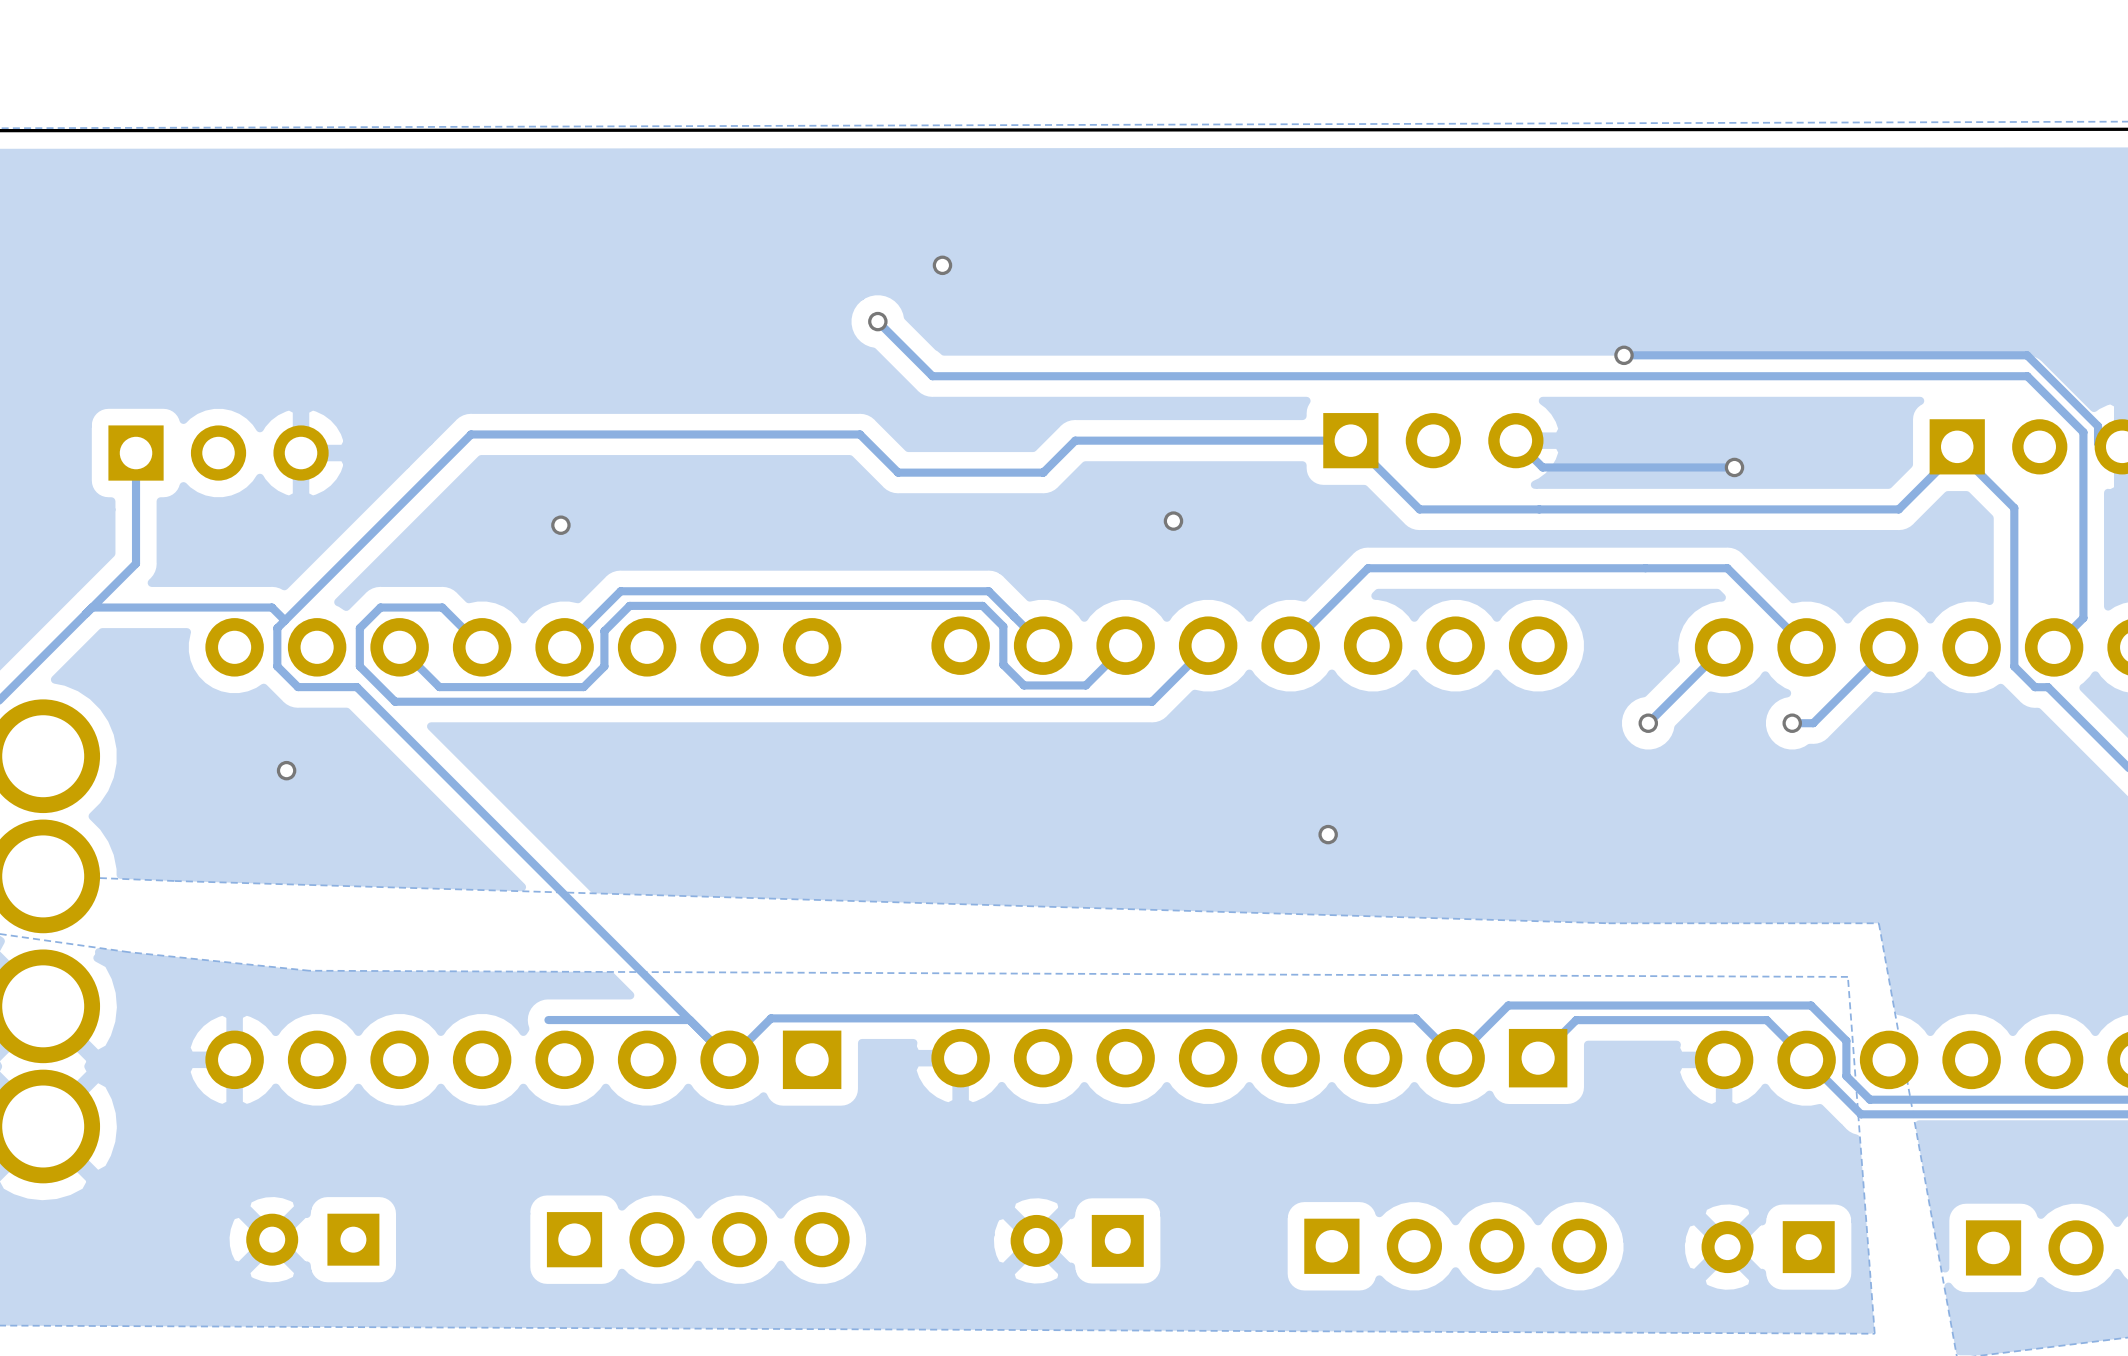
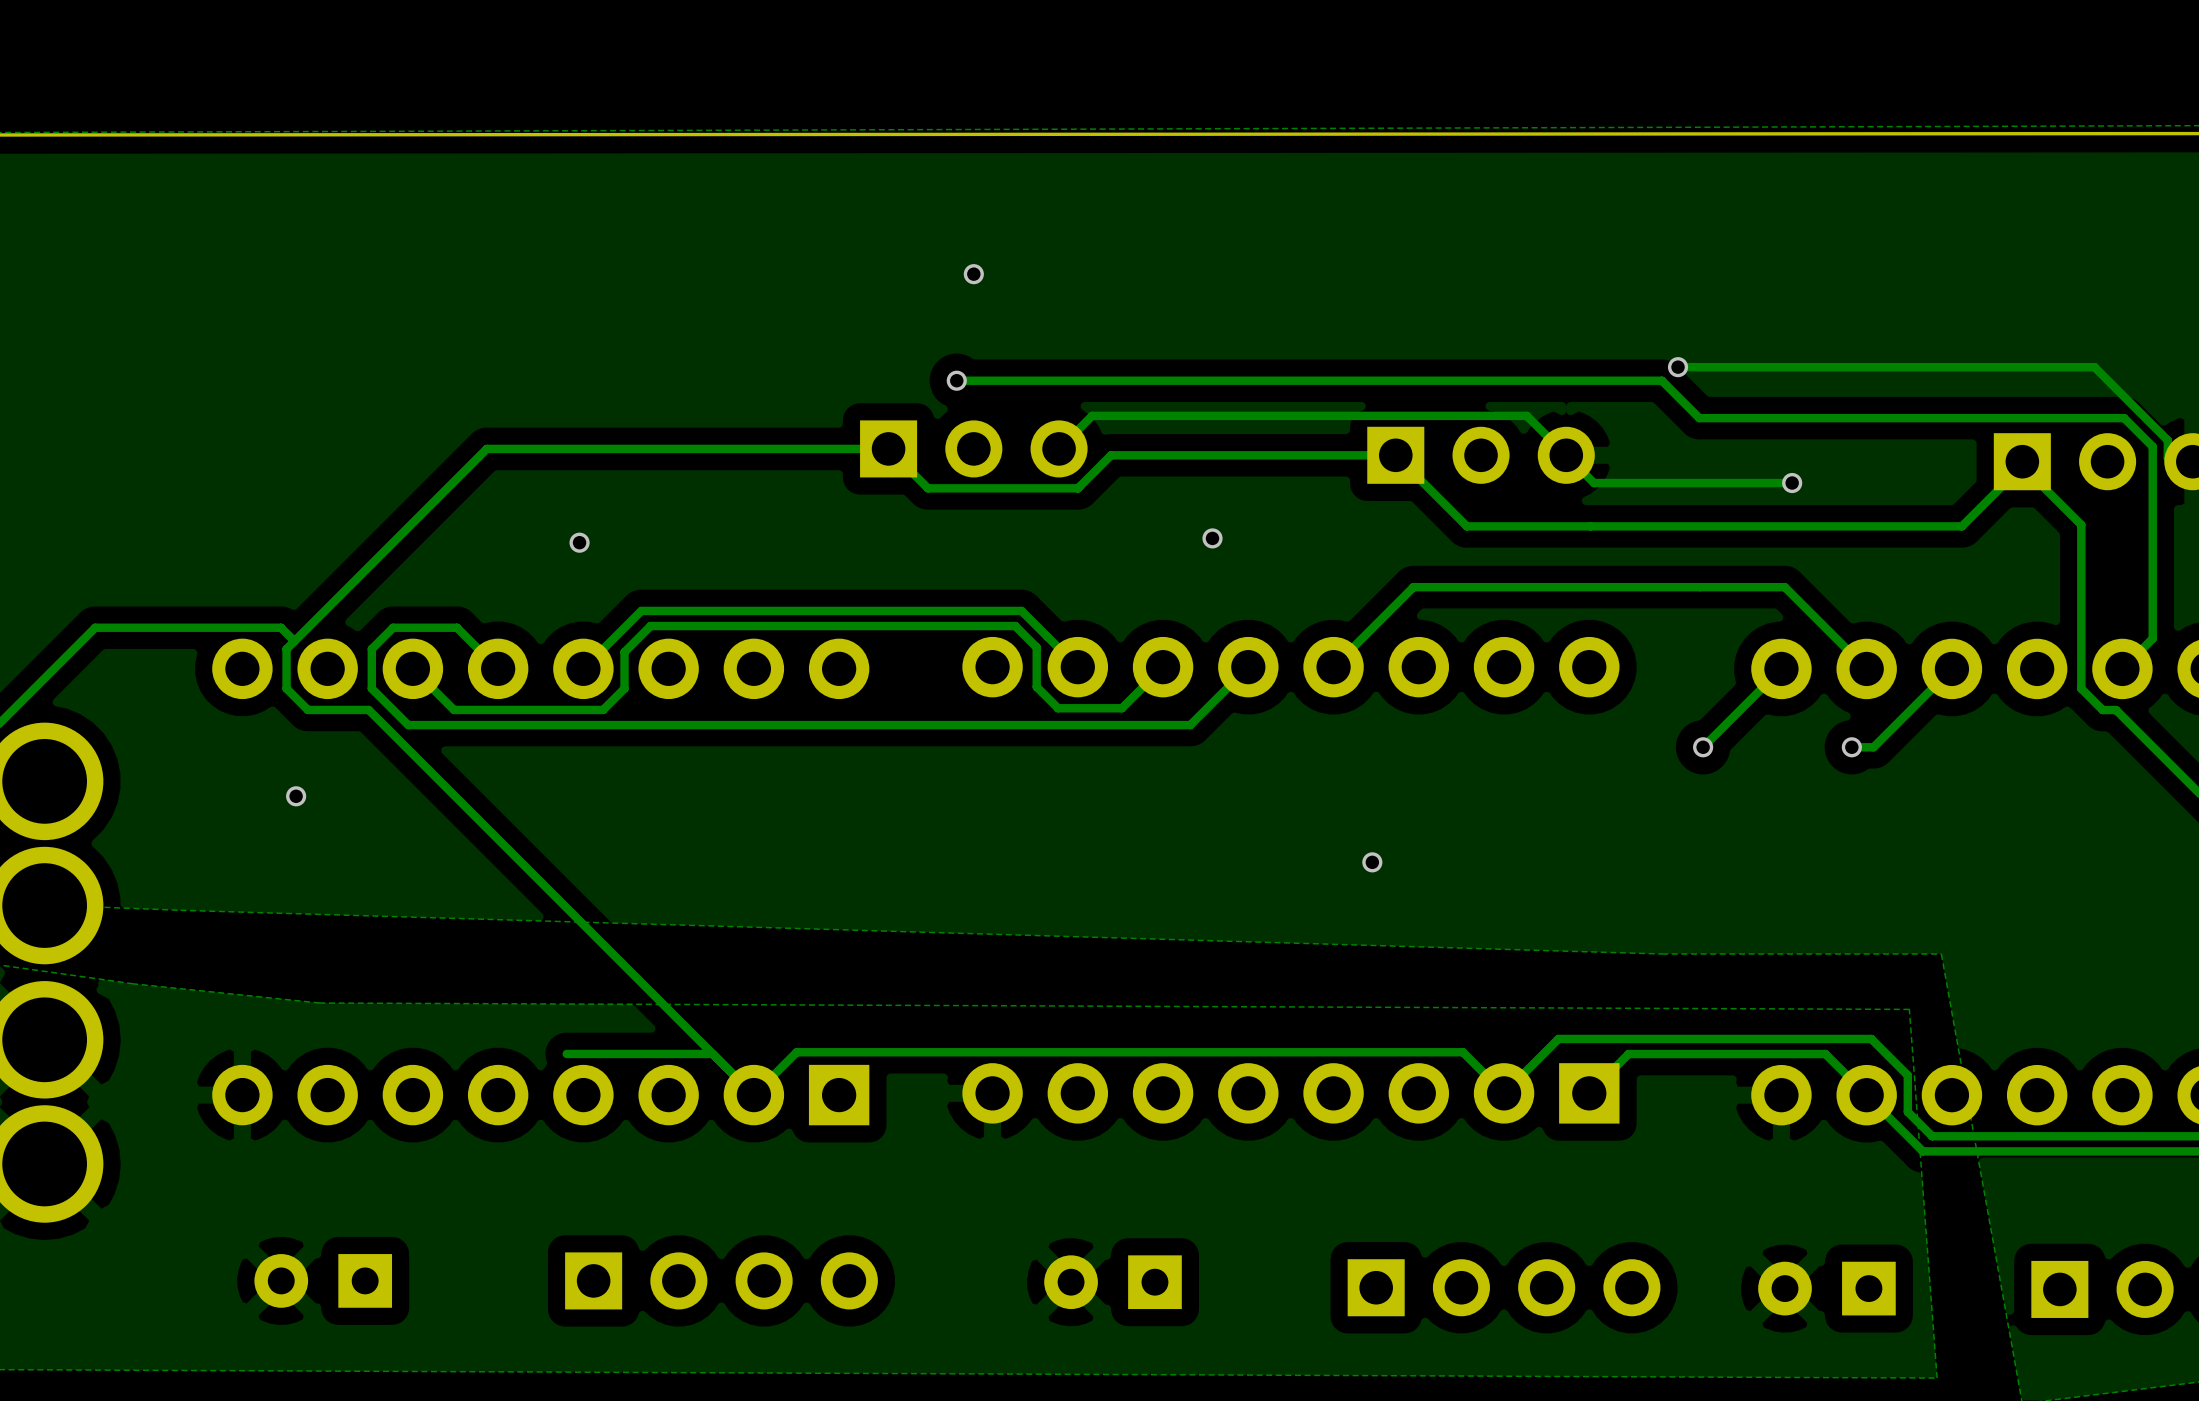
track: (877, 321) (932, 376) (2027, 376) (2055, 404) -> (956, 380) (1661, 380) (1699, 418) (2124, 418)
via position: (877, 321) -> (956, 380)
track: none -> (1059, 448) (1092, 415) (1526, 415) (1566, 455)
track: (136, 453) (136, 563) (92, 607) -> none
part position: (218, 453) -> (973, 448)

